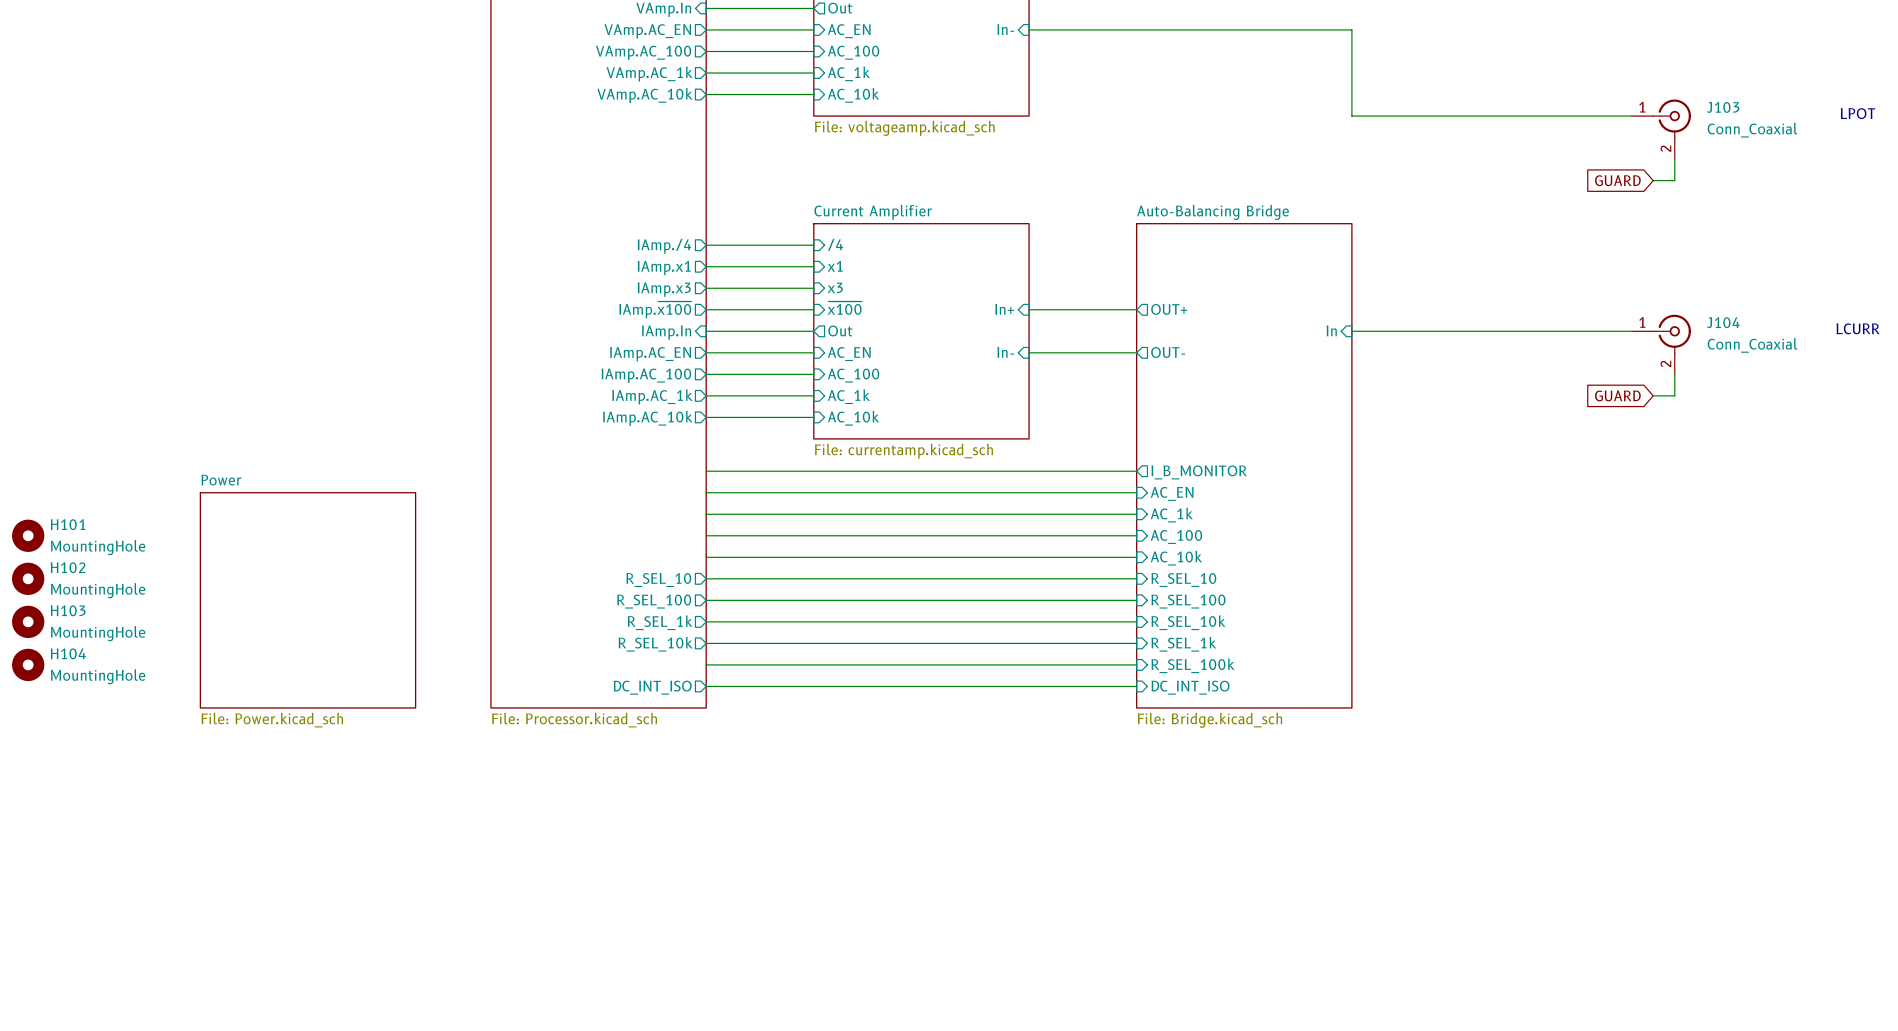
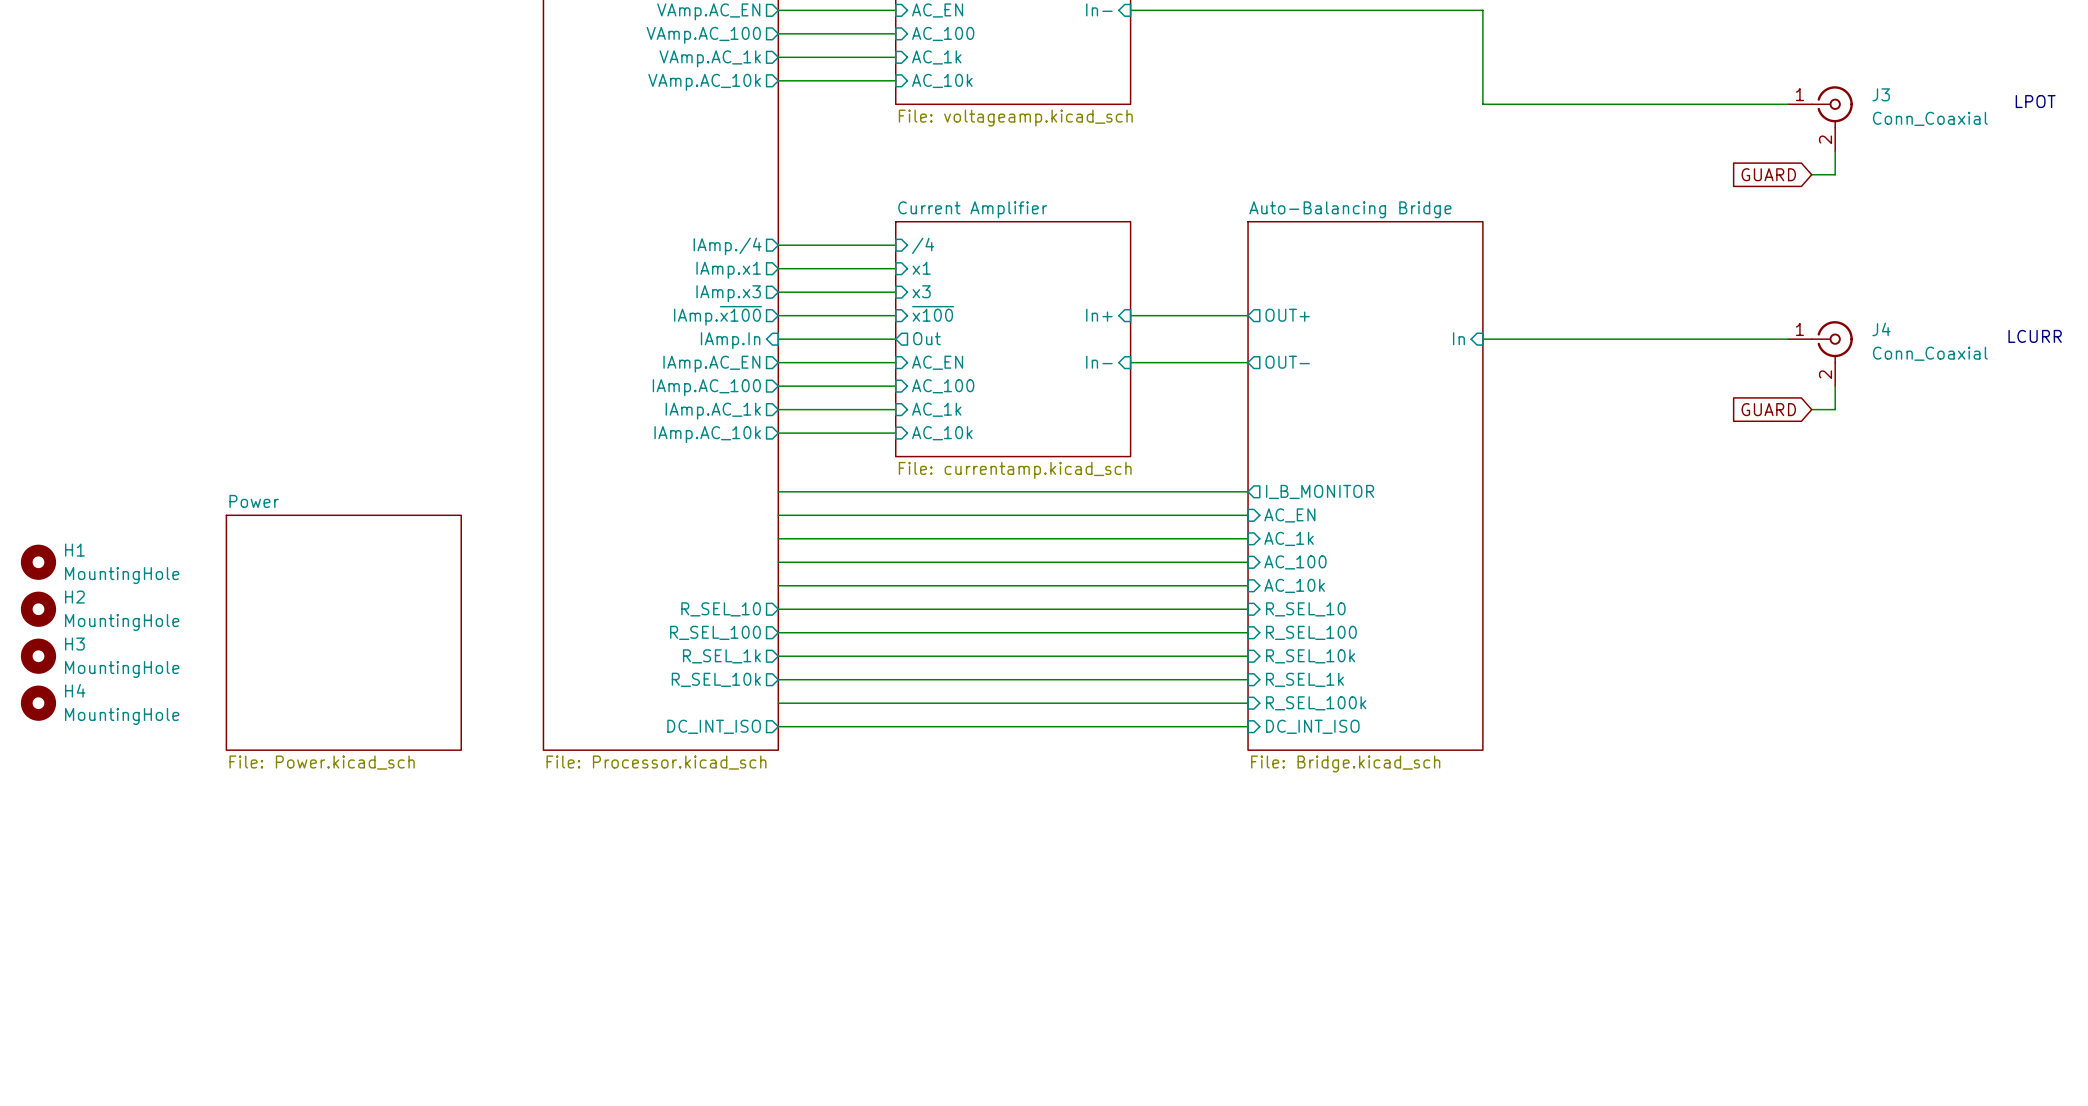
J103 name: J103 (1723, 107) -> J3 (1881, 94)
J104 name: J104 (1723, 322) -> J4 (1881, 329)
H101 name: H101 (68, 524) -> H1 (74, 550)
H102 name: H102 (68, 567) -> H2 (74, 597)
H103 name: H103 (68, 610) -> H3 (74, 644)
H104 name: H104 (68, 653) -> H4 (75, 690)

